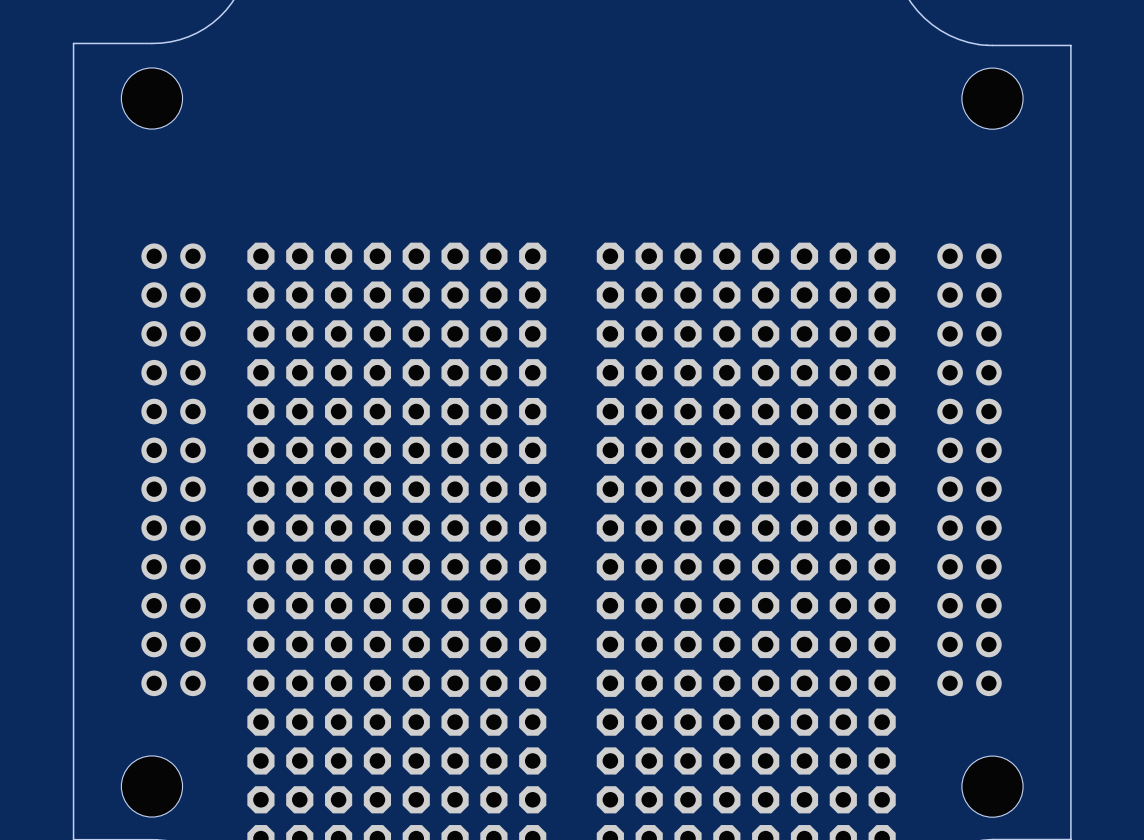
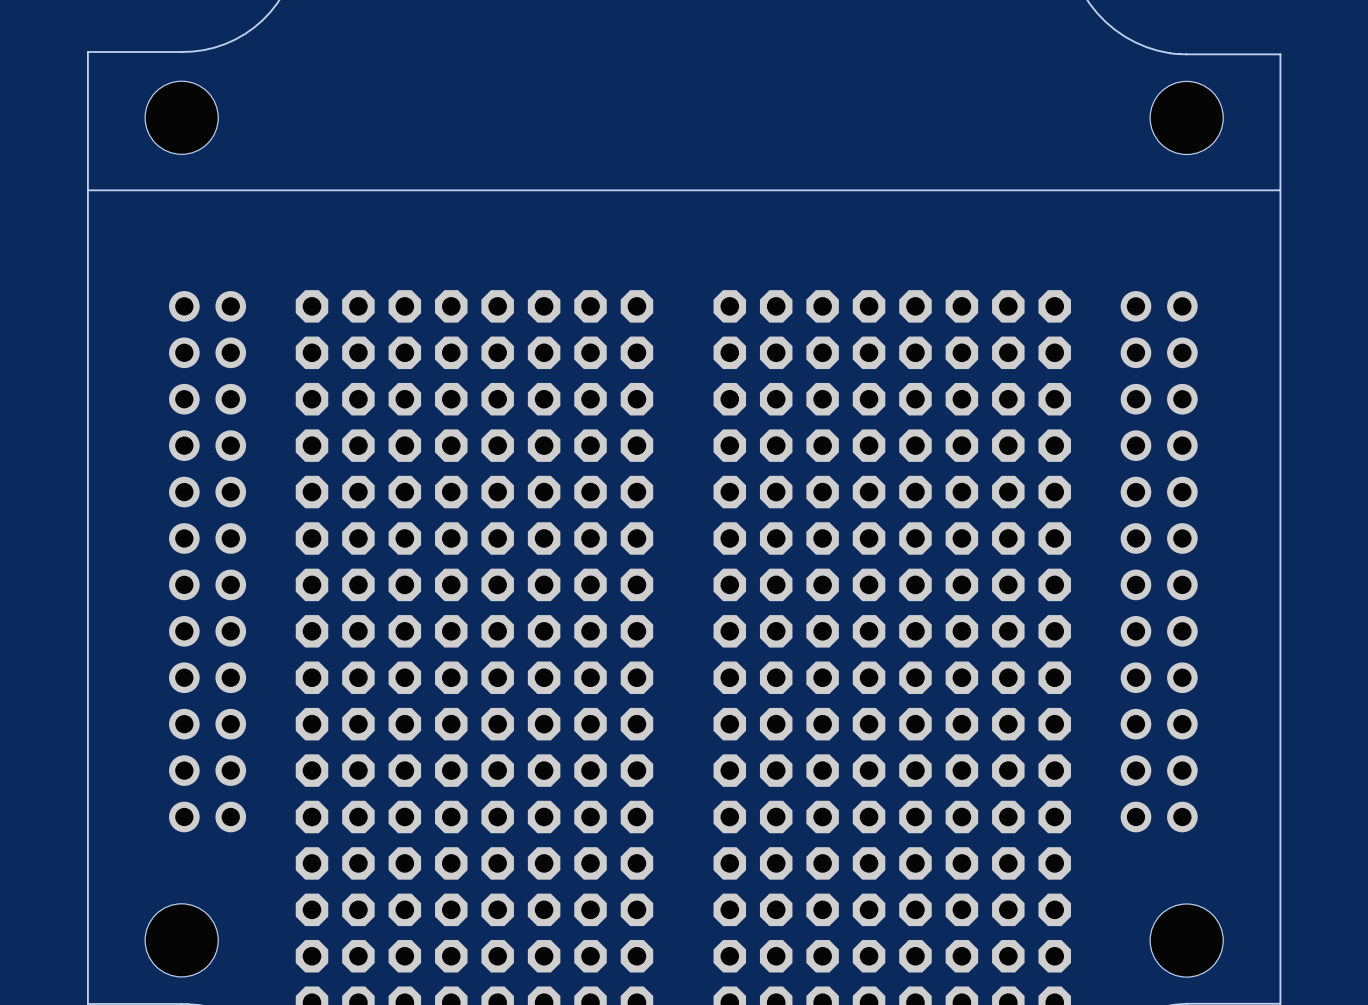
board edge: none -> (1279, 190) (89, 190)

